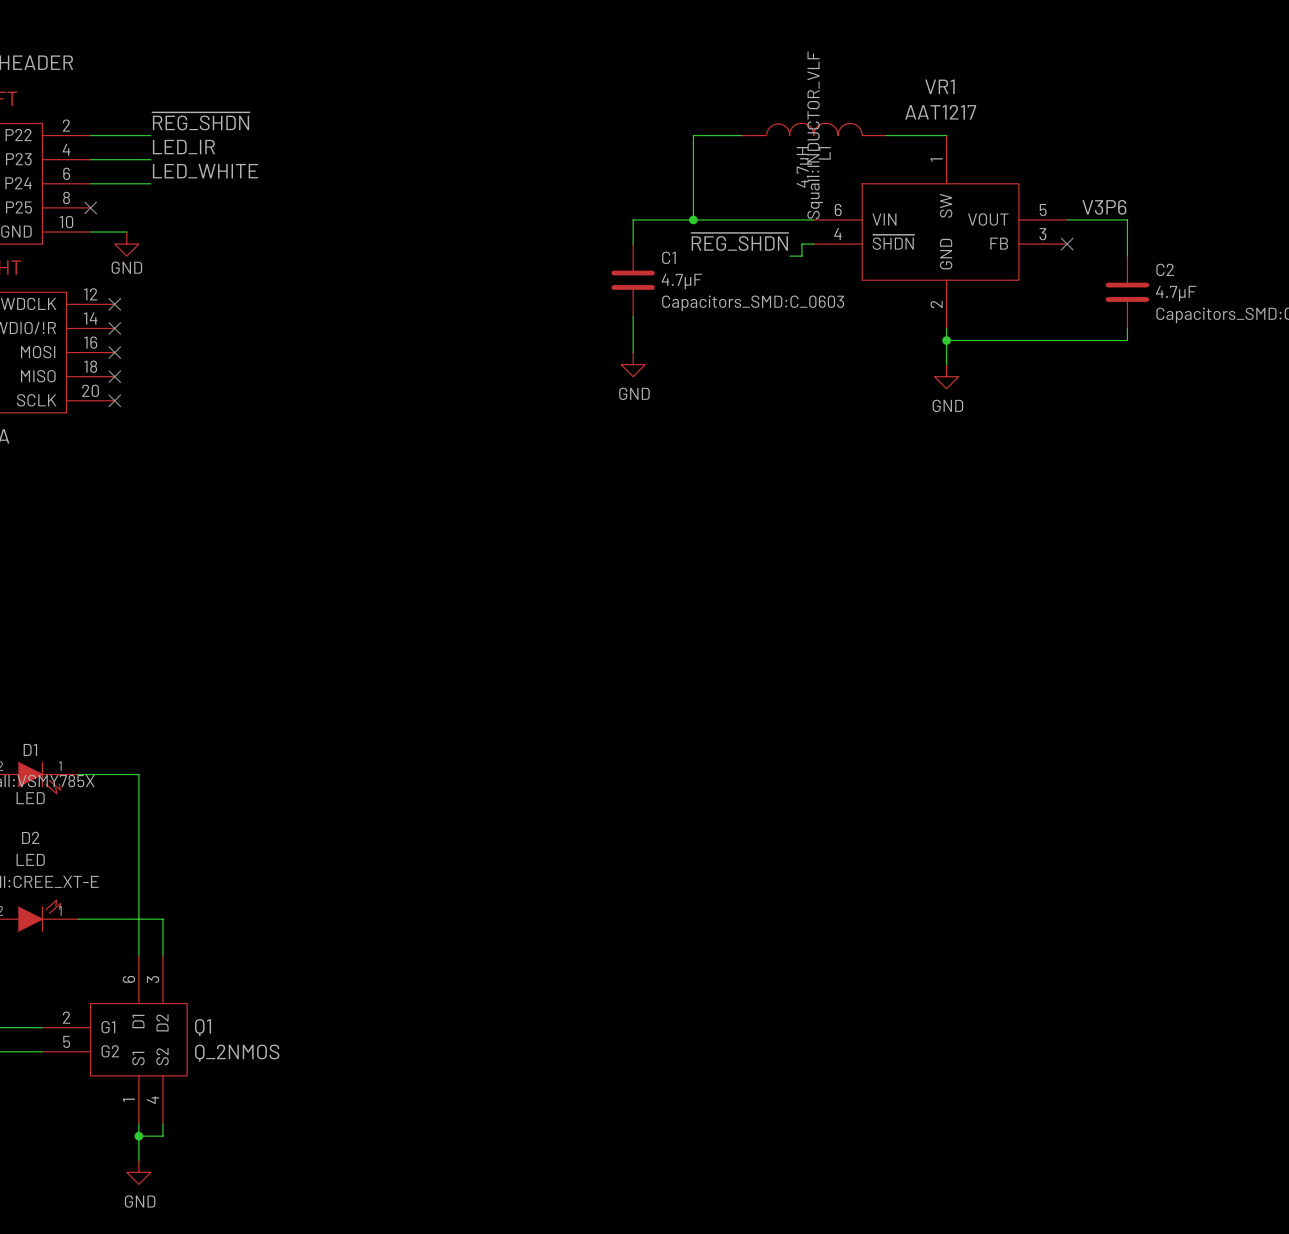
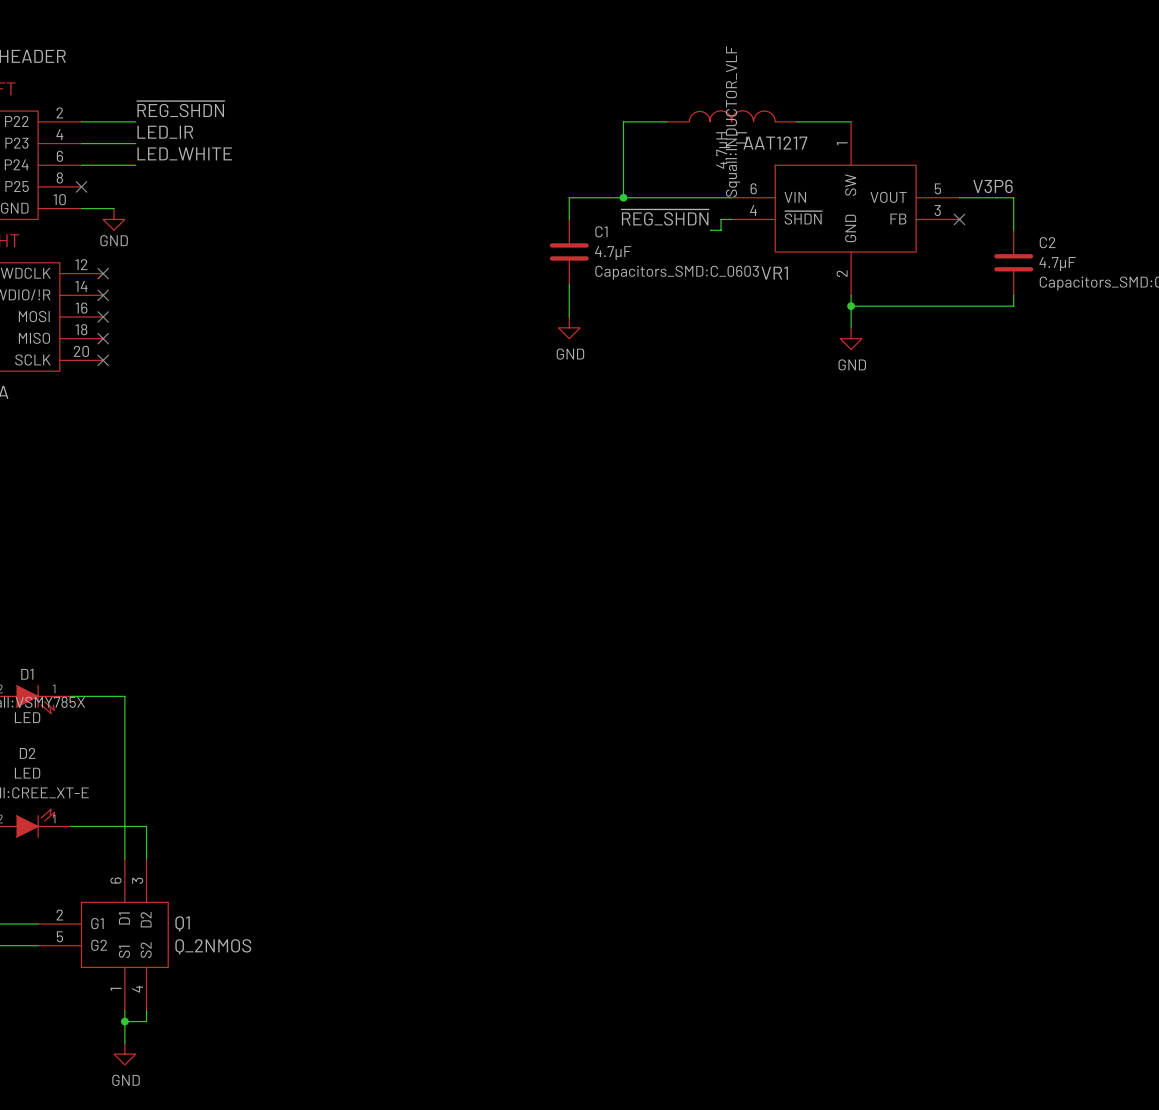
VR1 name position: VR1 (939, 86) -> VR1 (774, 273)
VR1 value position: AAT1217 (940, 112) -> AAT1217 (775, 143)

